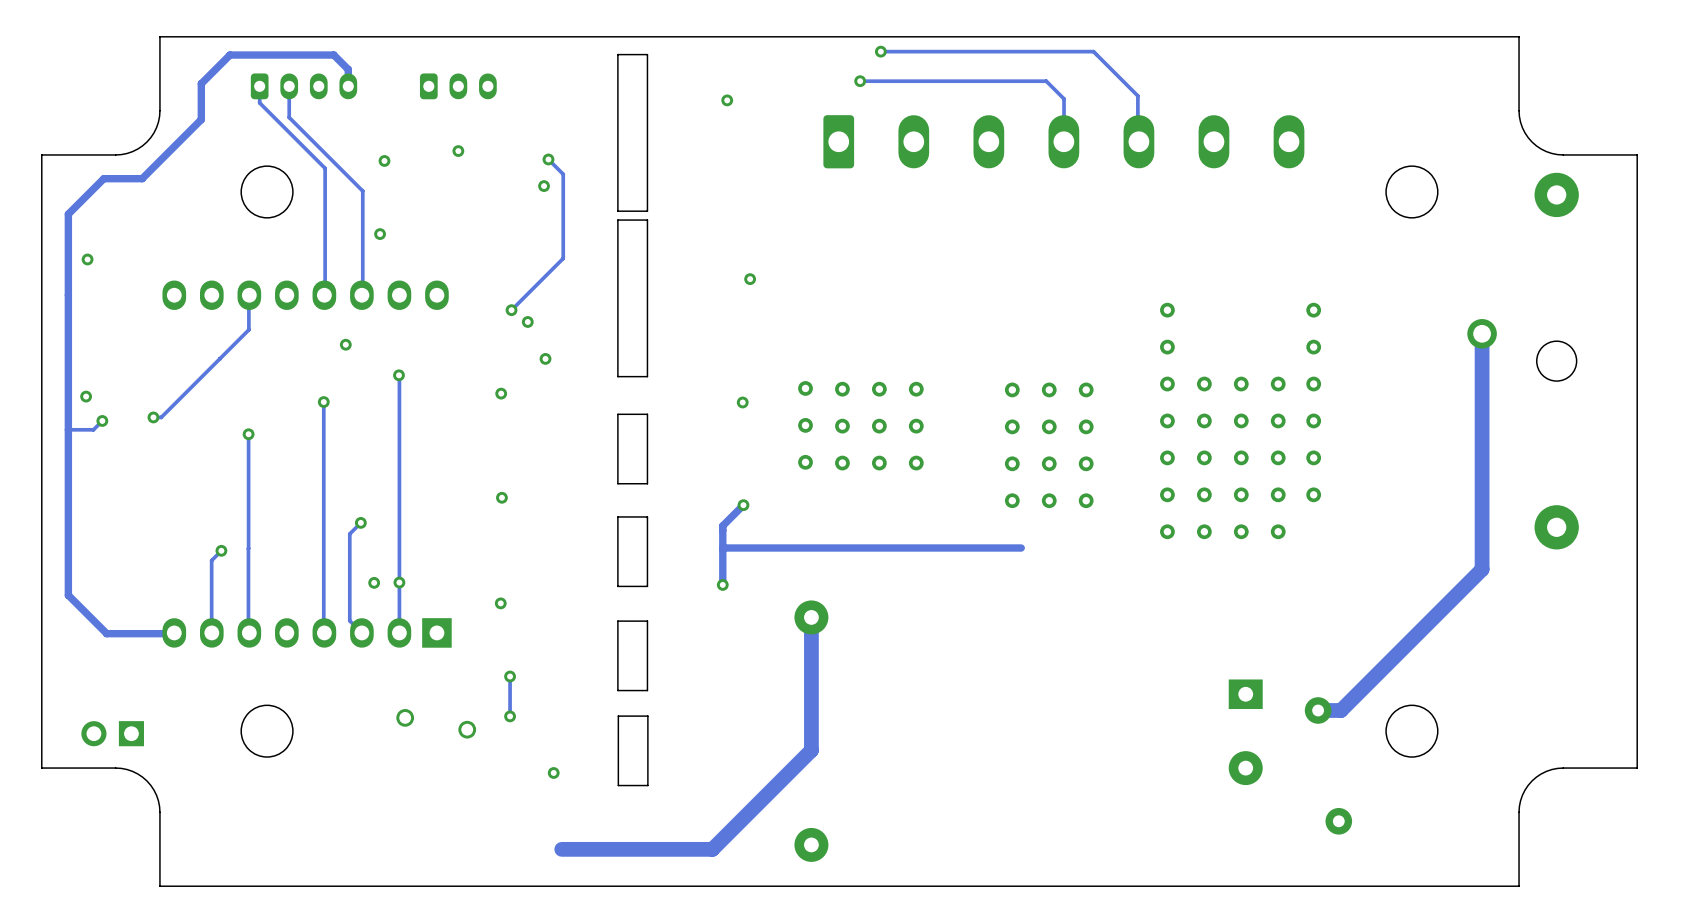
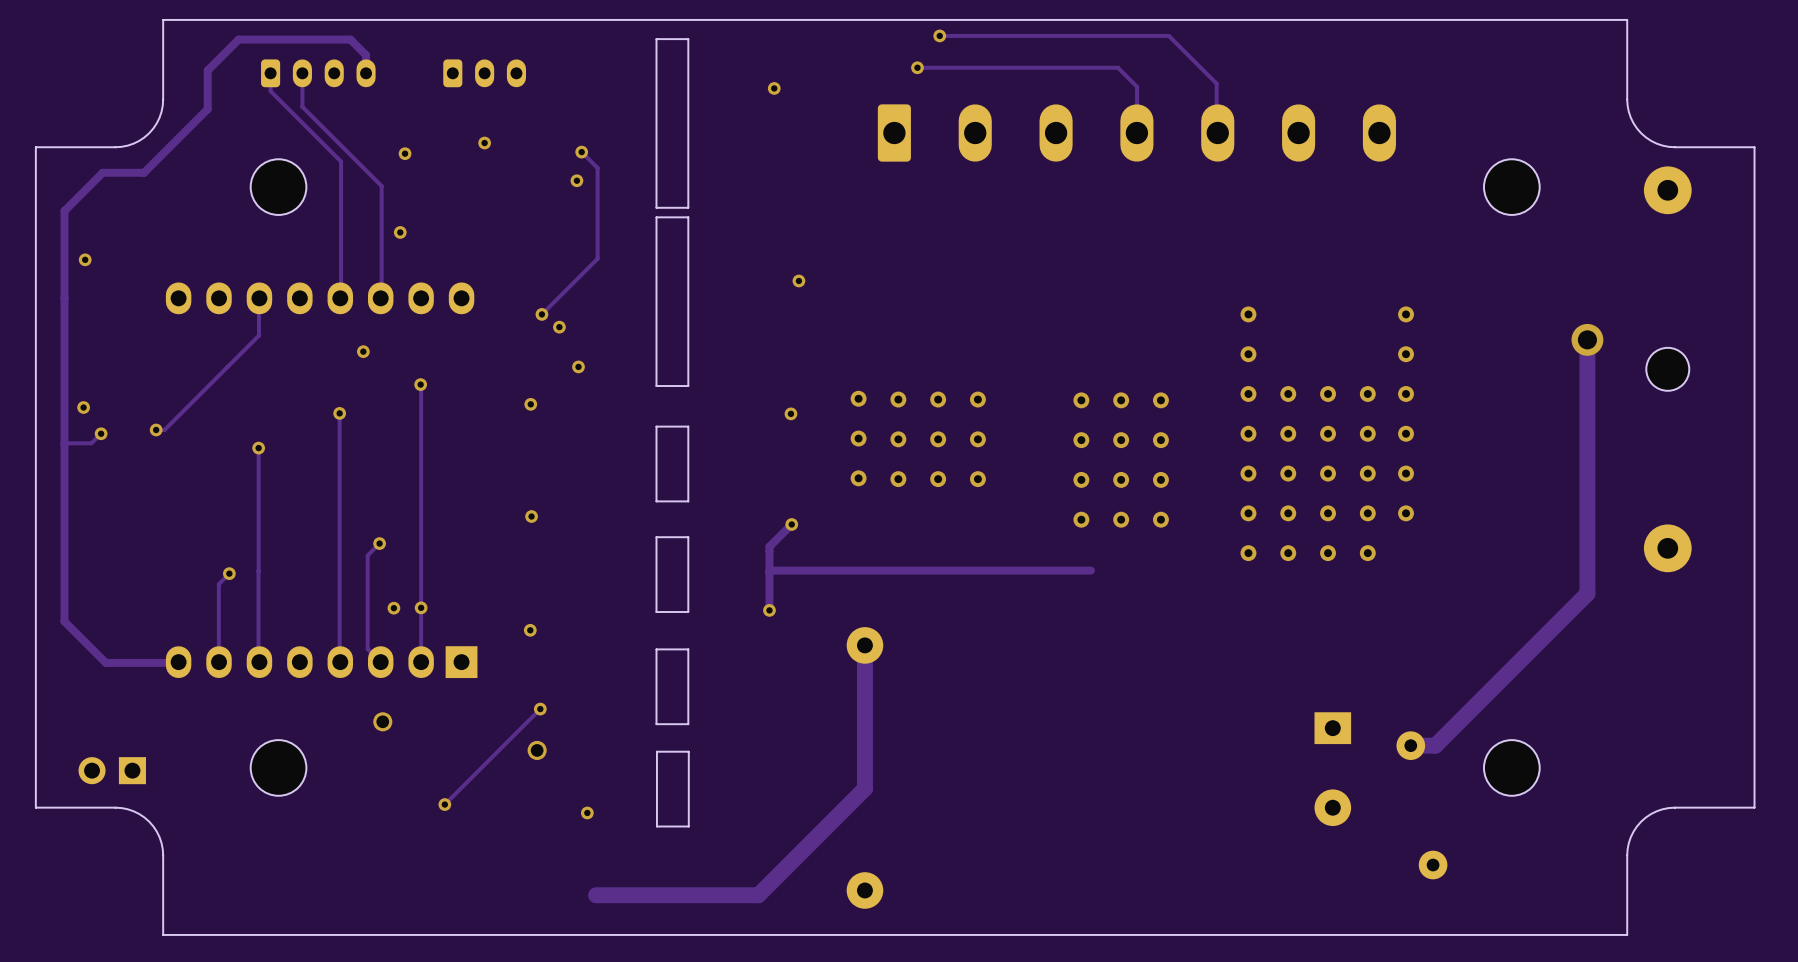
track: (510, 676) (510, 716) -> (540, 709) (444, 804)
via: (510, 716) -> none
via position: (405, 717) -> (382, 721)
via position: (467, 729) -> (537, 750)
via: none -> (444, 804)

